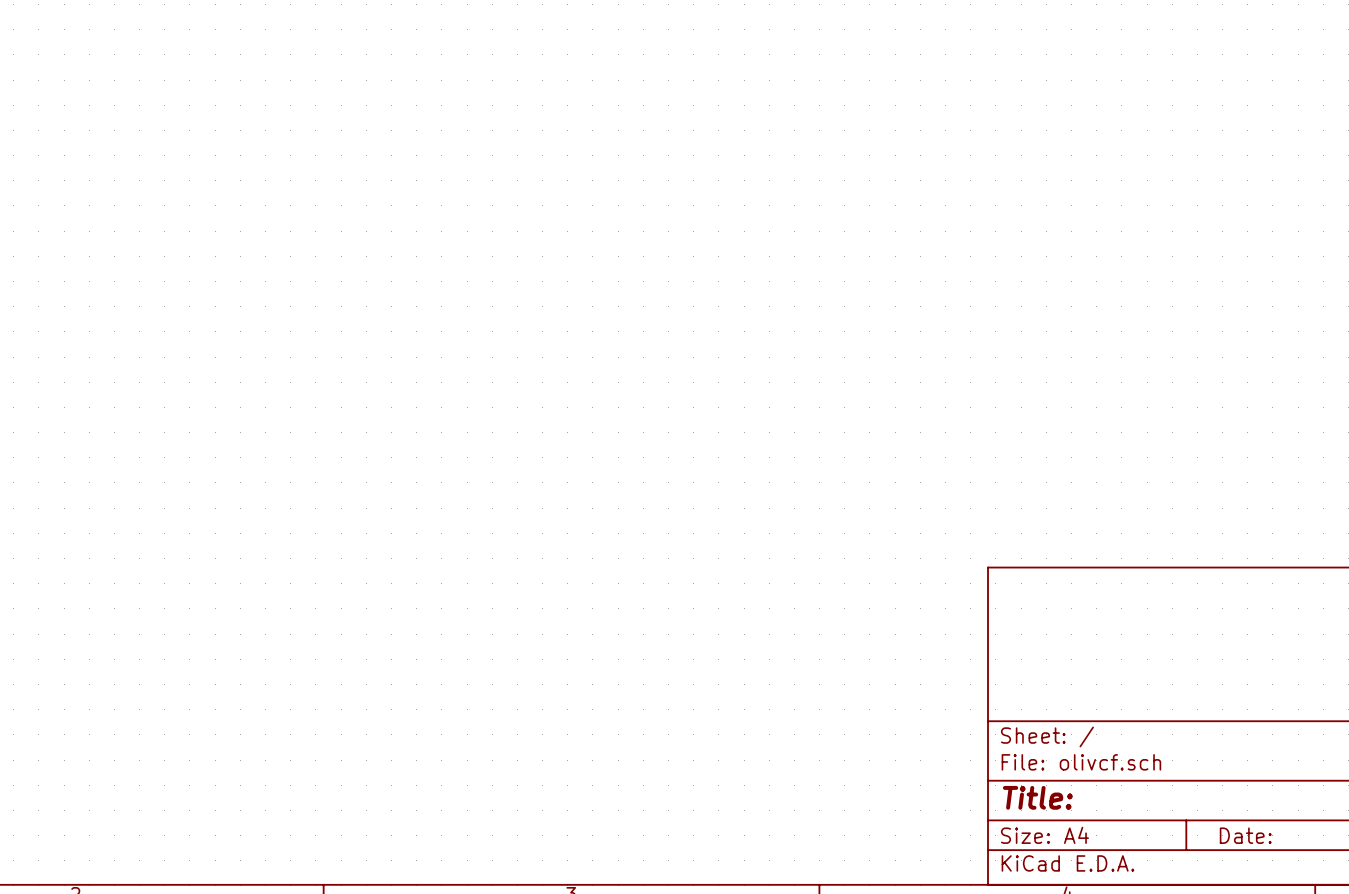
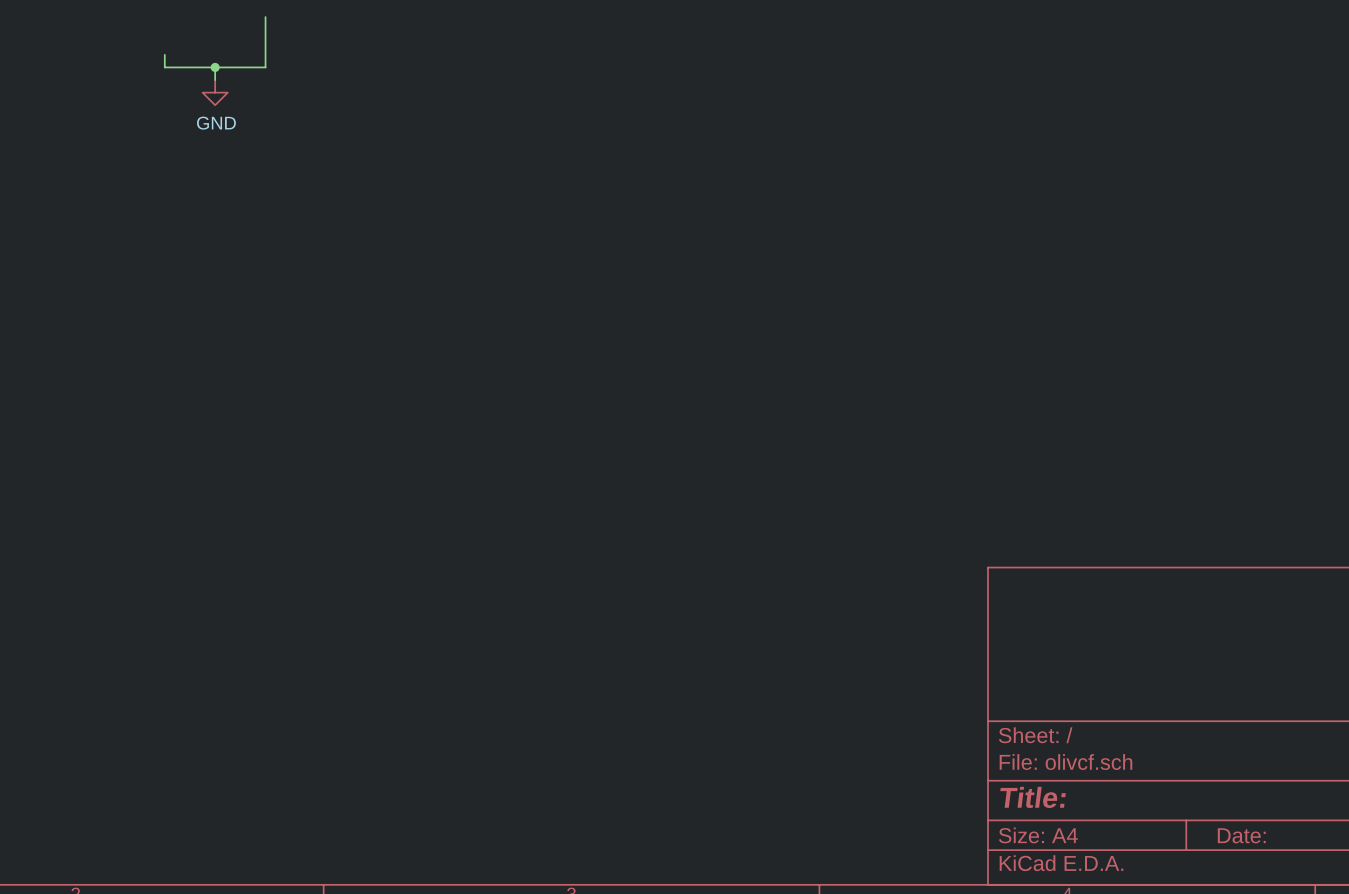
wire: none -> (265, 17) (265, 67) (164, 67) (164, 54)
wire: none -> (215, 67) (215, 80)
junction: none -> (215, 67)
power symbol: none -> GND (215, 92)

